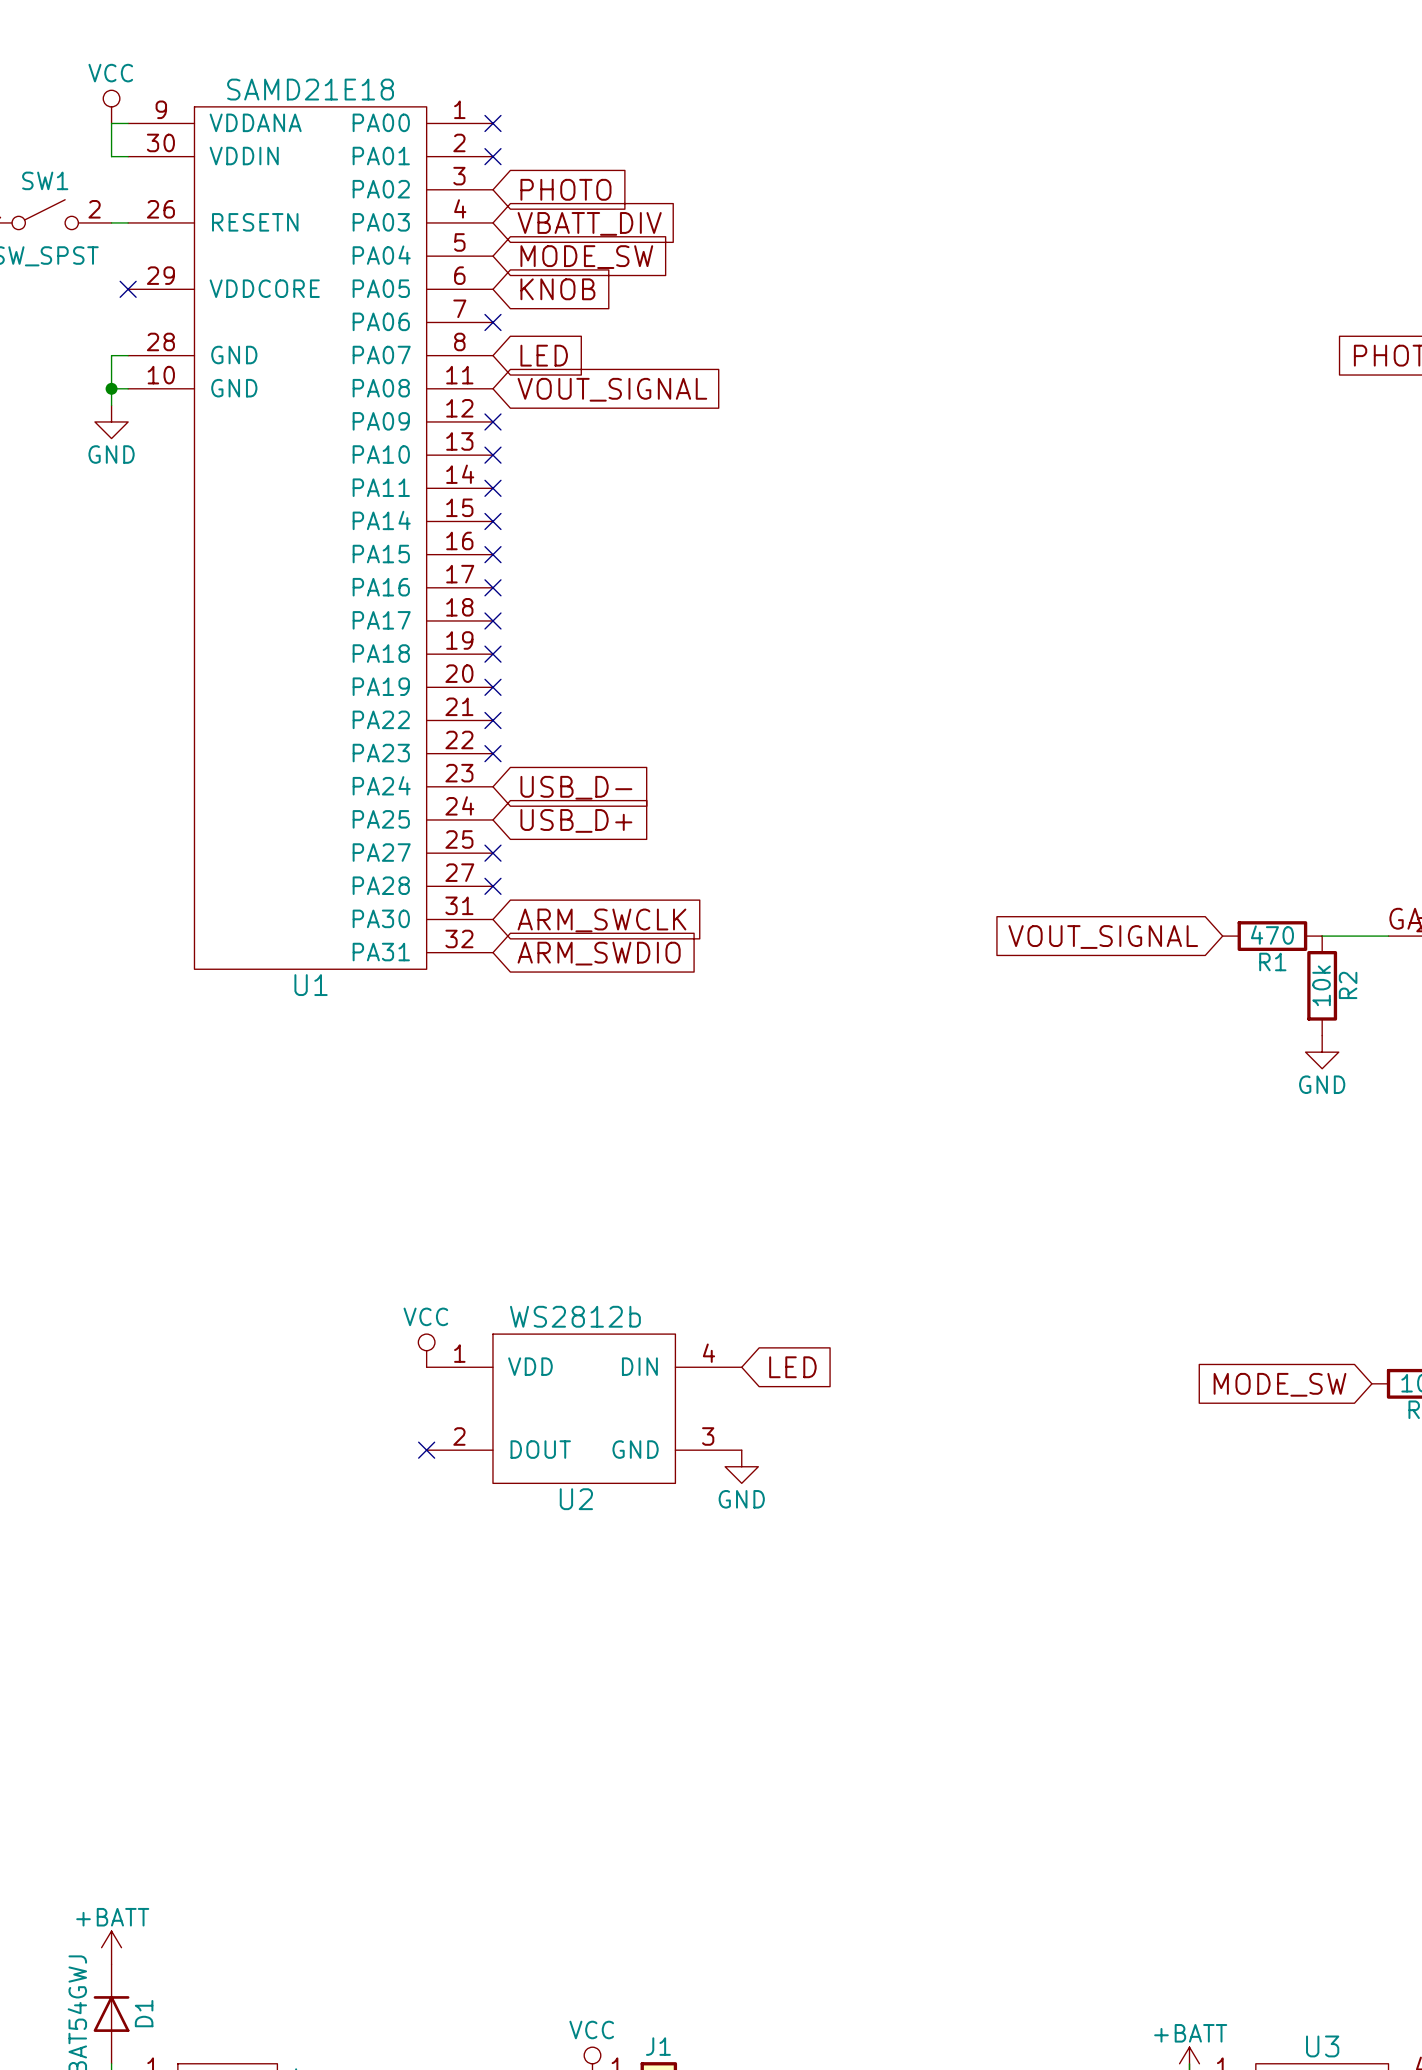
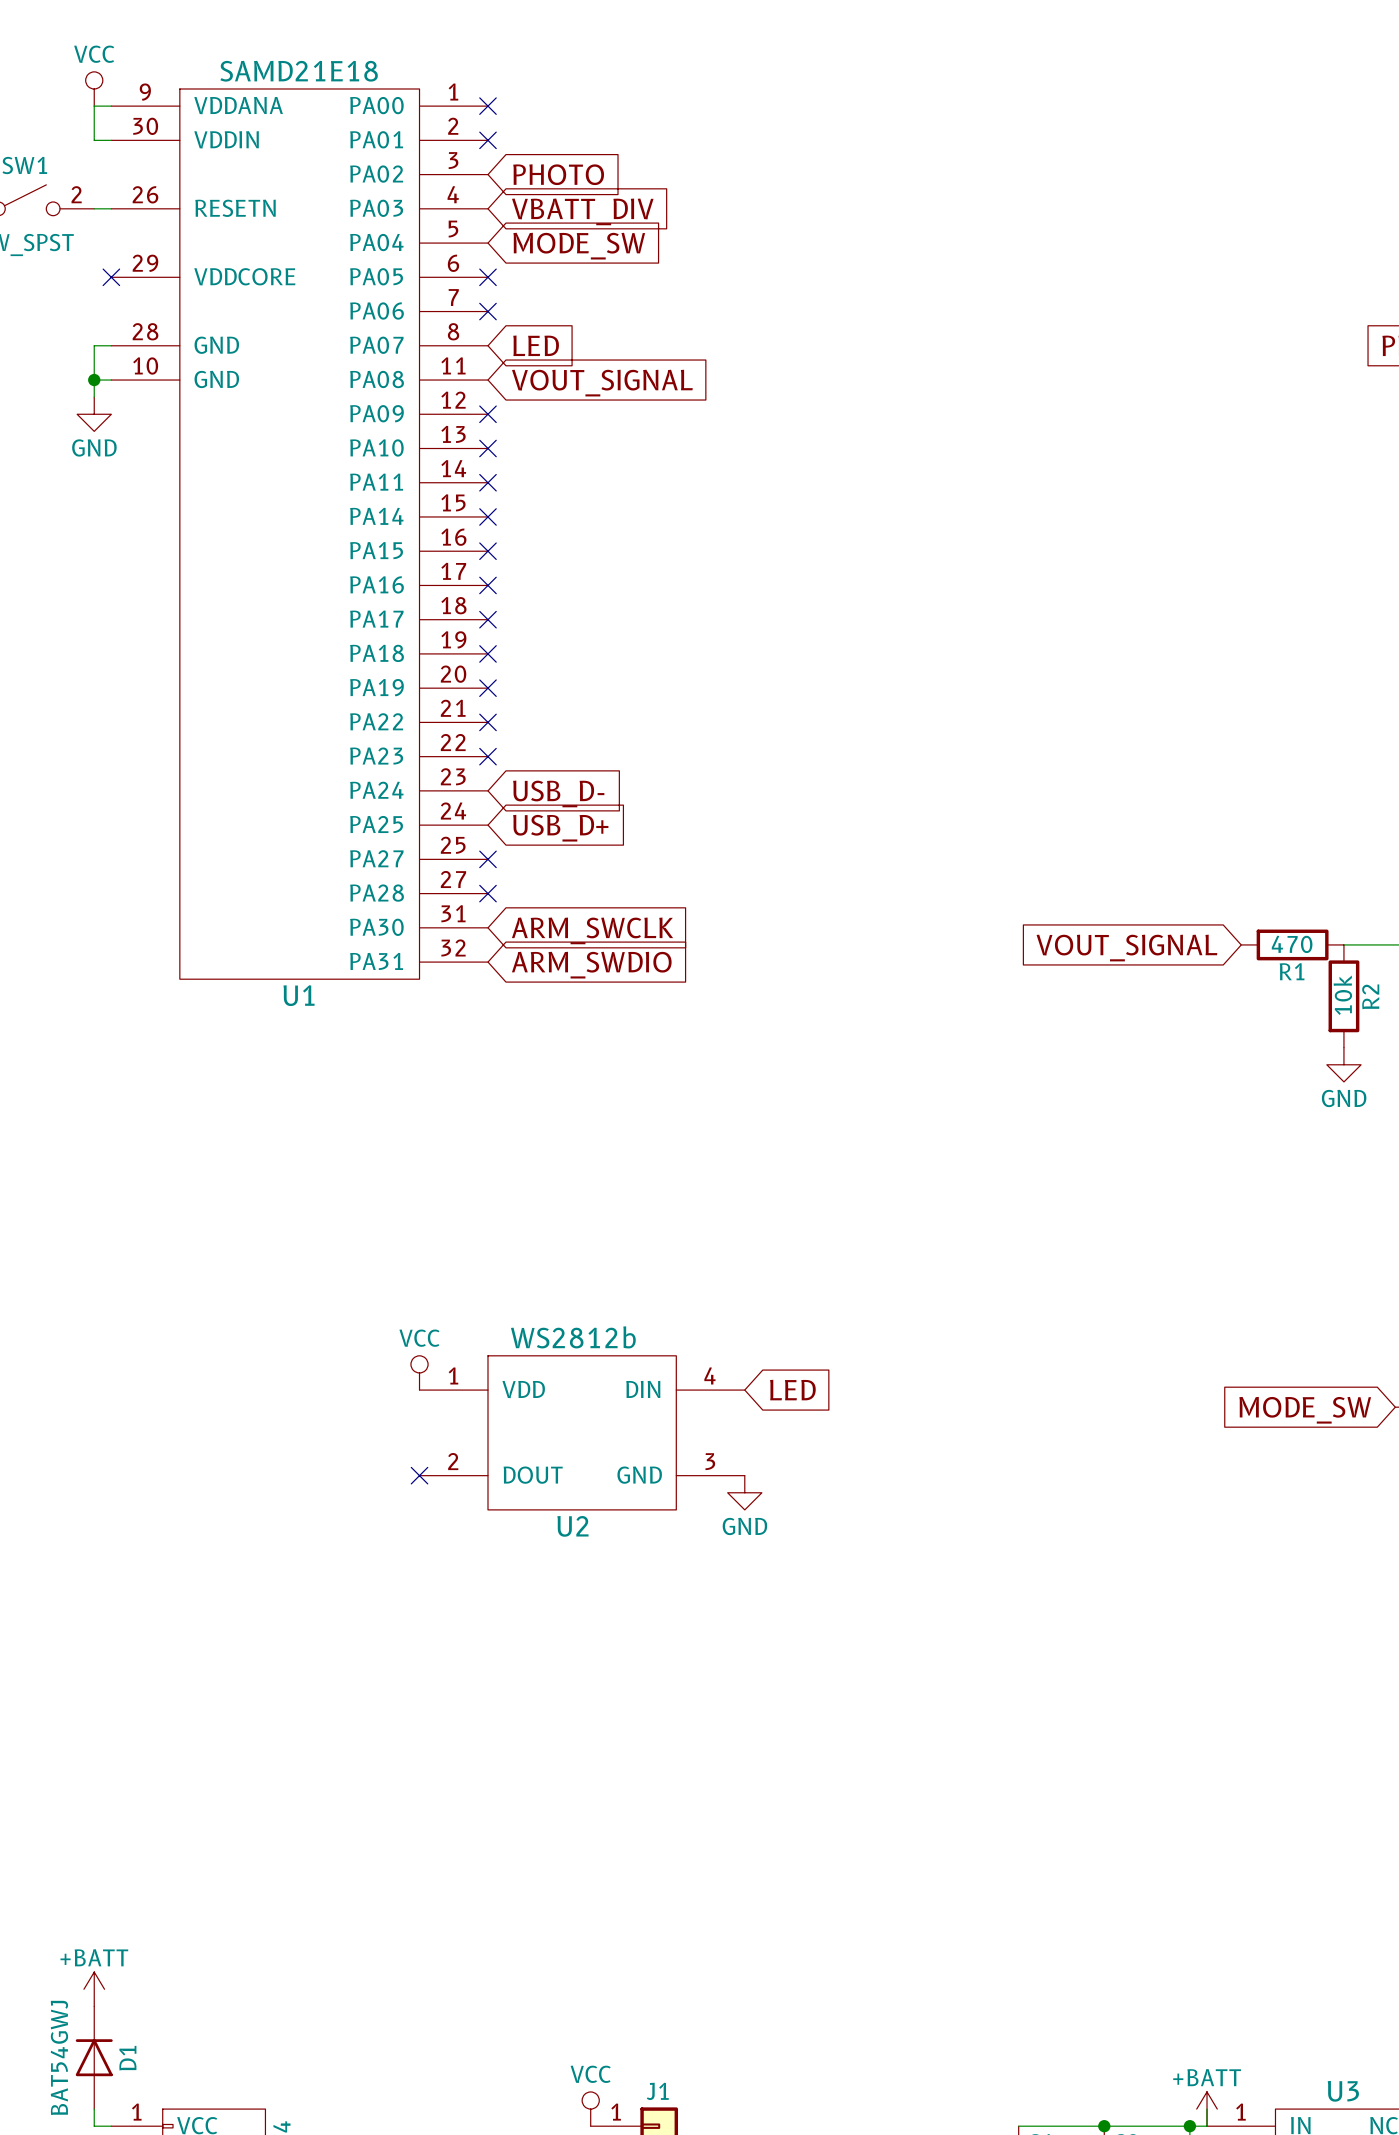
no-connect mark: none -> (487, 277)
global label: KNOB (557, 289) -> none

